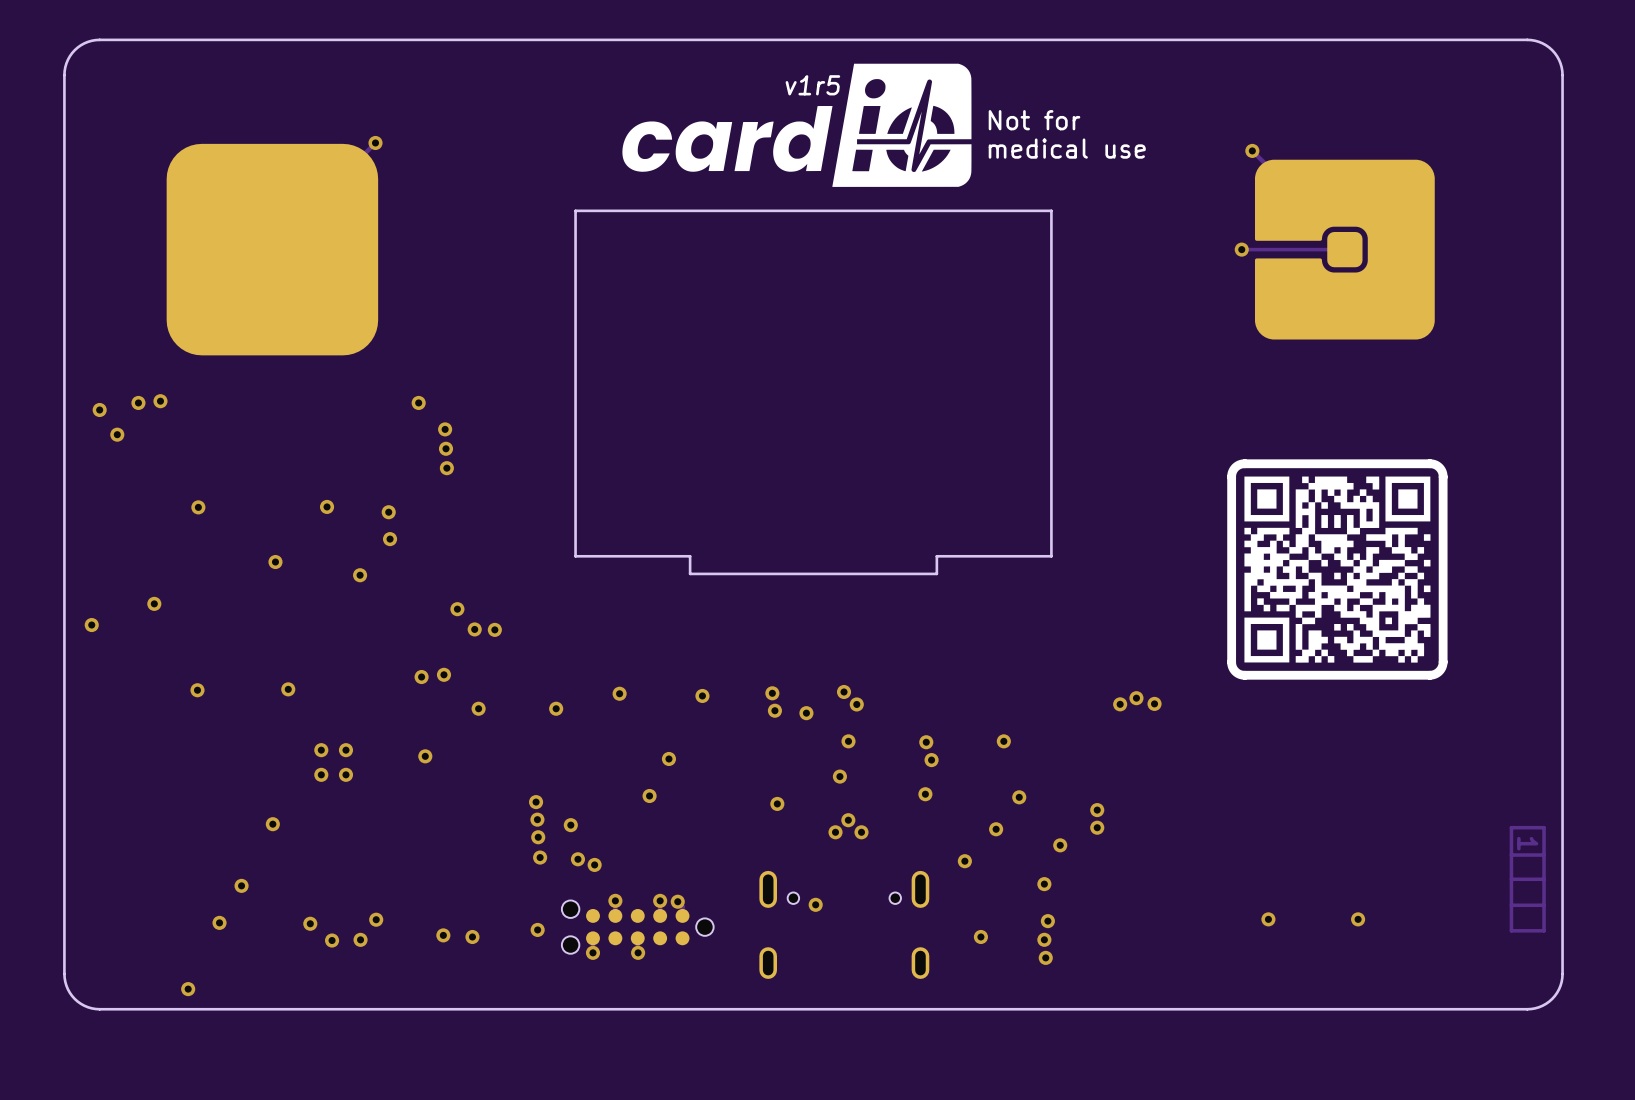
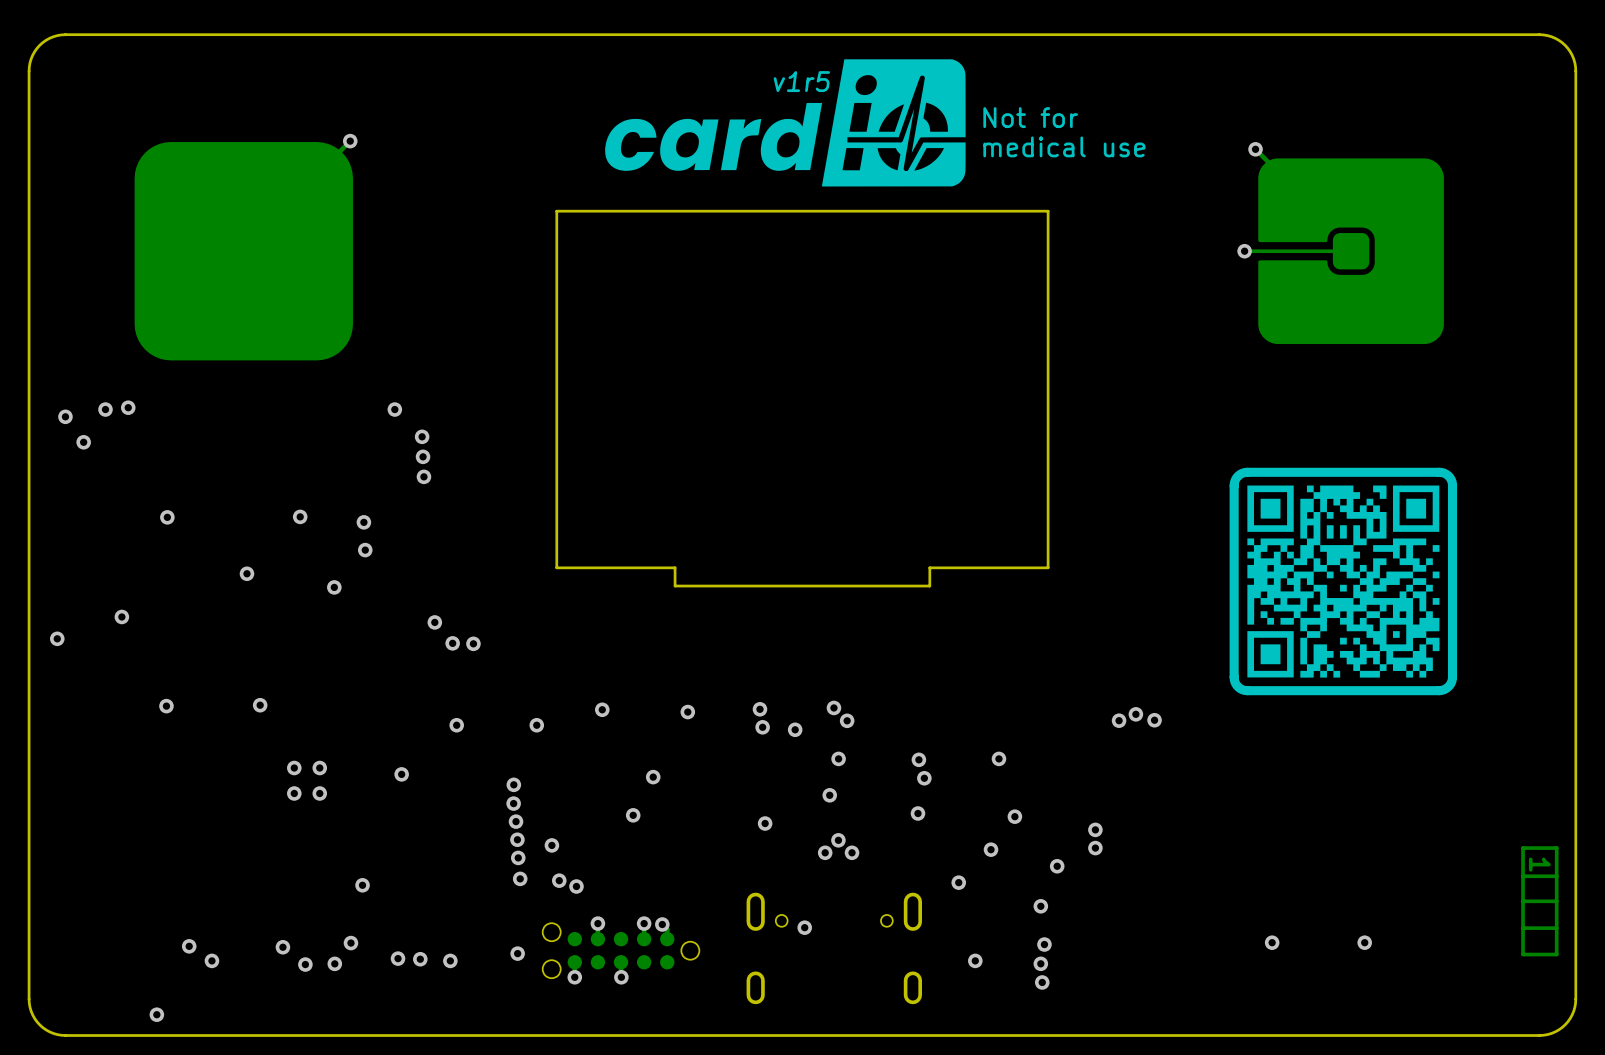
via: (443, 674) -> none
via: (421, 677) -> none
via: none -> (513, 784)
via: none -> (513, 803)
via: (272, 824) -> none
via: none -> (362, 885)
via position: (241, 885) -> (211, 960)
via: none -> (398, 958)

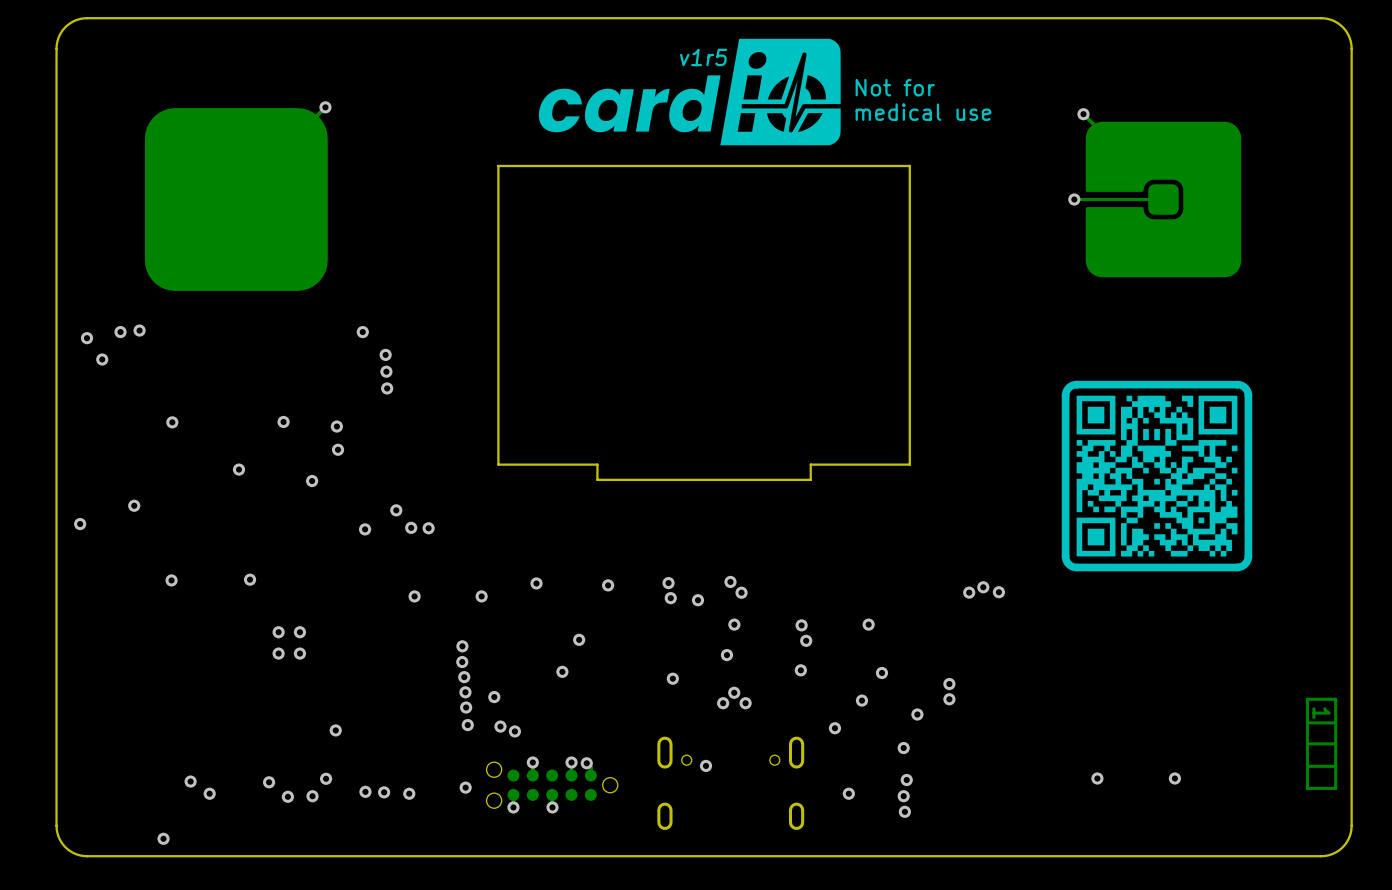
via: none -> (365, 529)
via: (401, 774) -> none

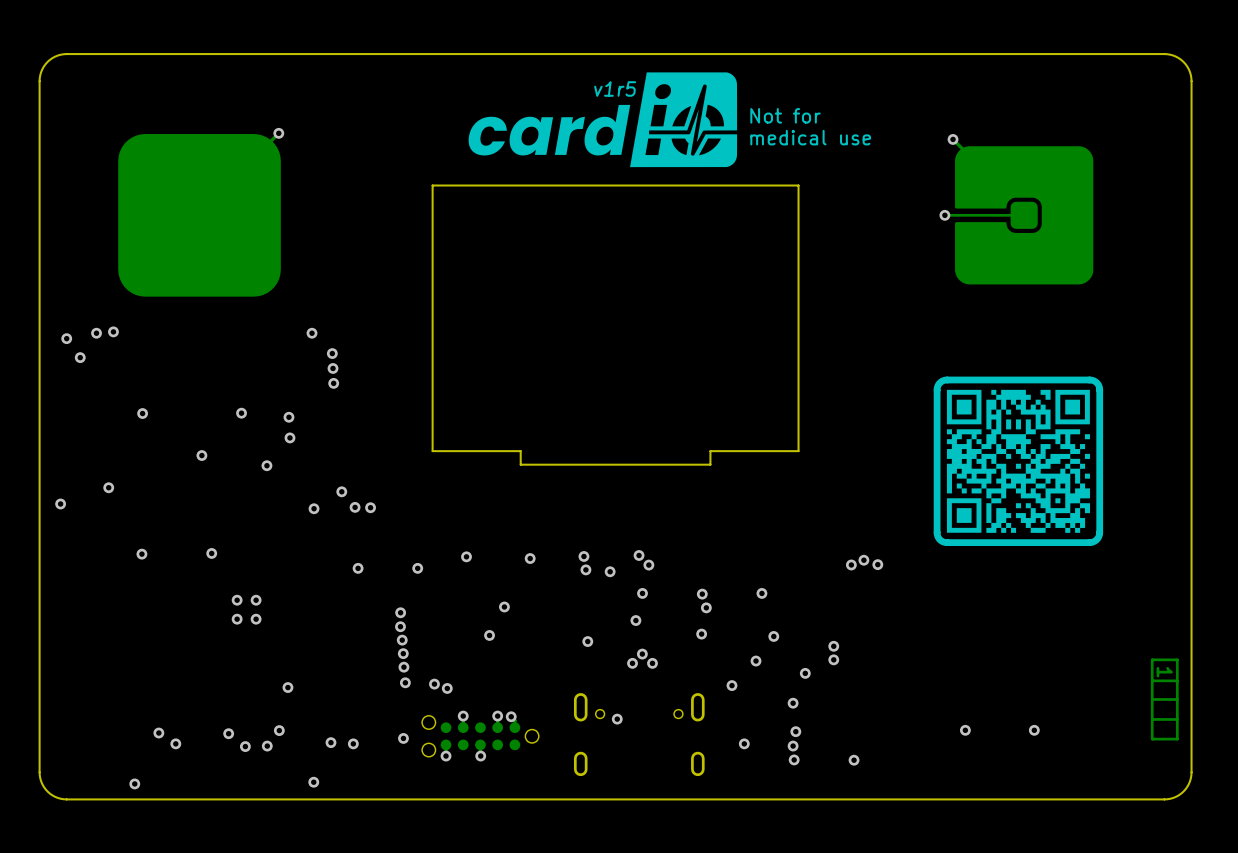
via: (494, 697) -> none
via position: (365, 791) -> (313, 782)
via: none -> (854, 760)

